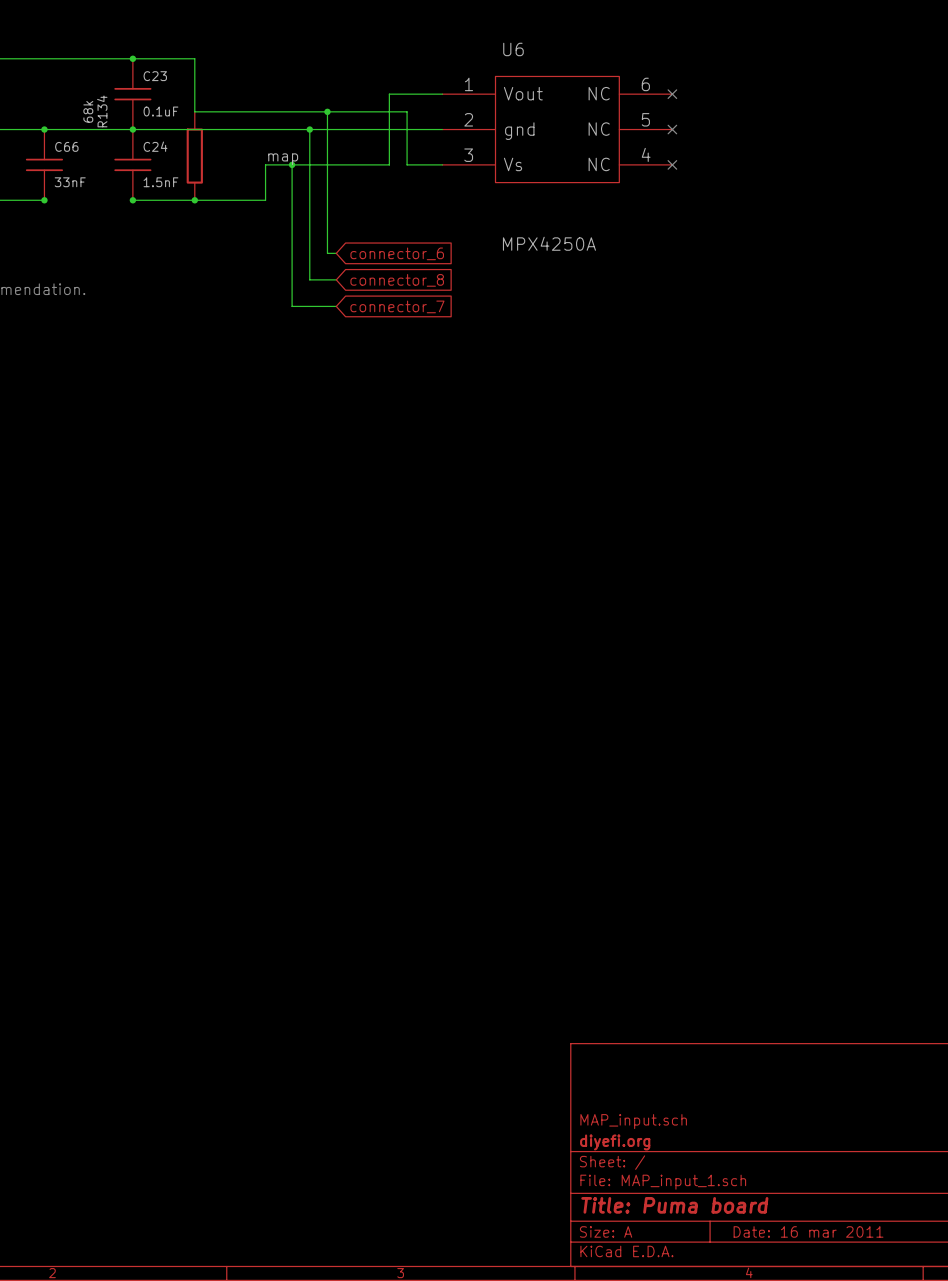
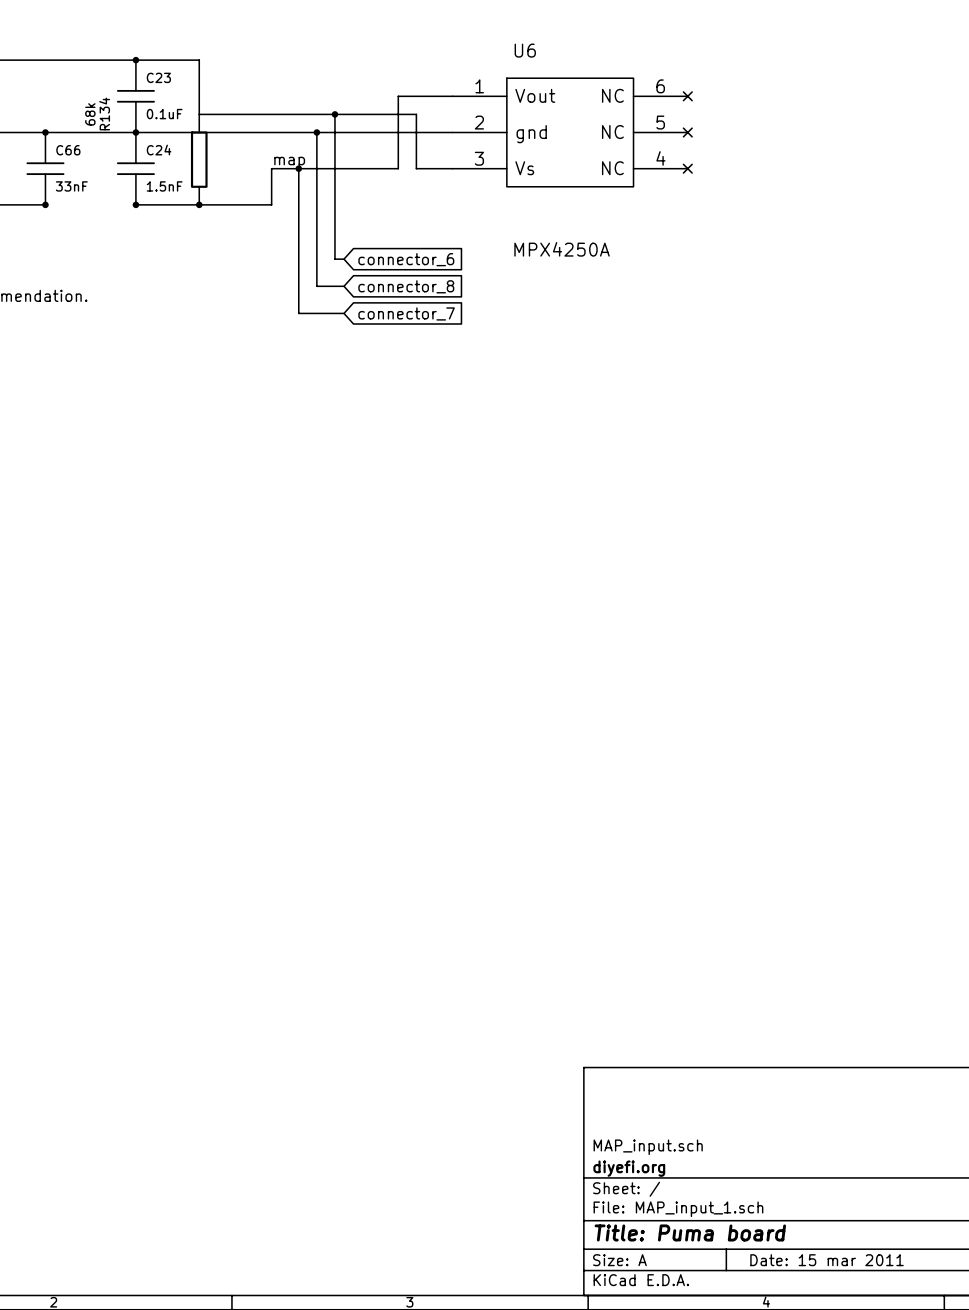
title block: Date: 16 mar 2011 (808, 1231) -> Date: 15 mar 2011 (827, 1260)

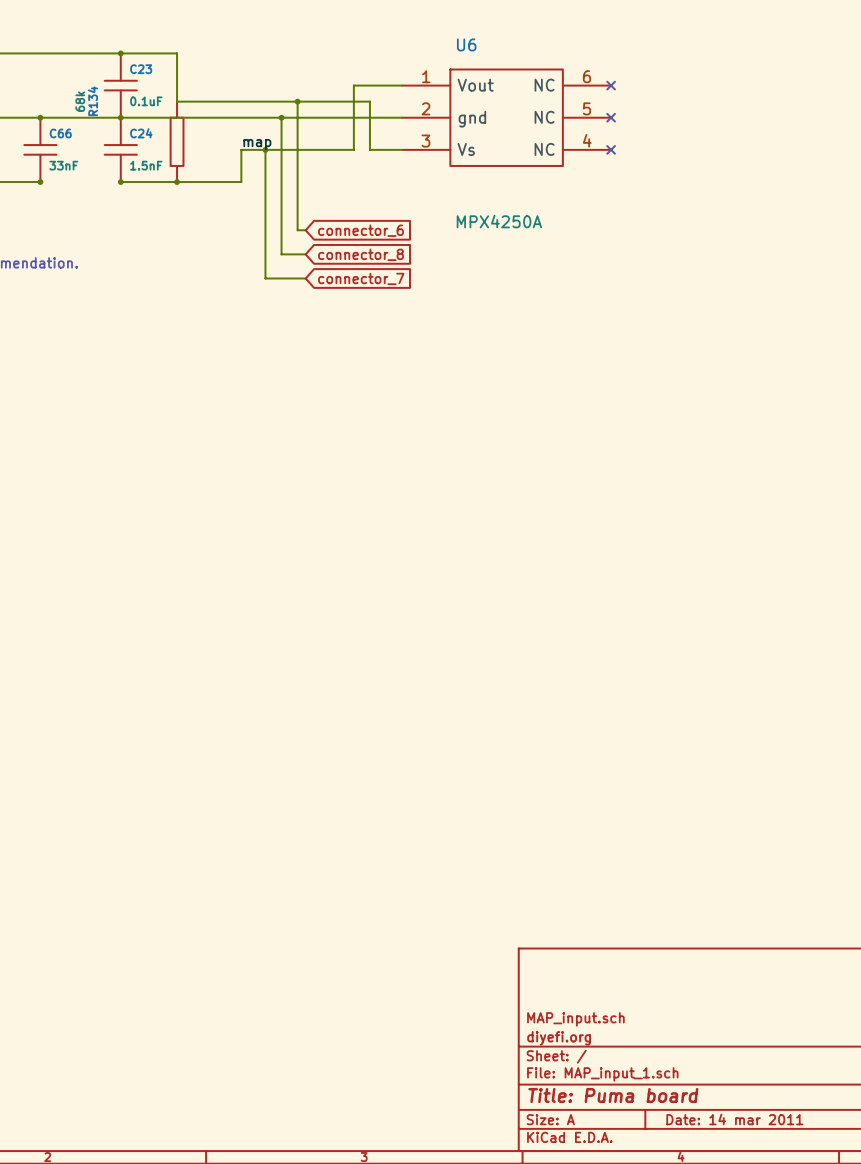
title block: Date: 15 mar 2011 (827, 1260) -> Date: 14 mar 2011 (734, 1119)

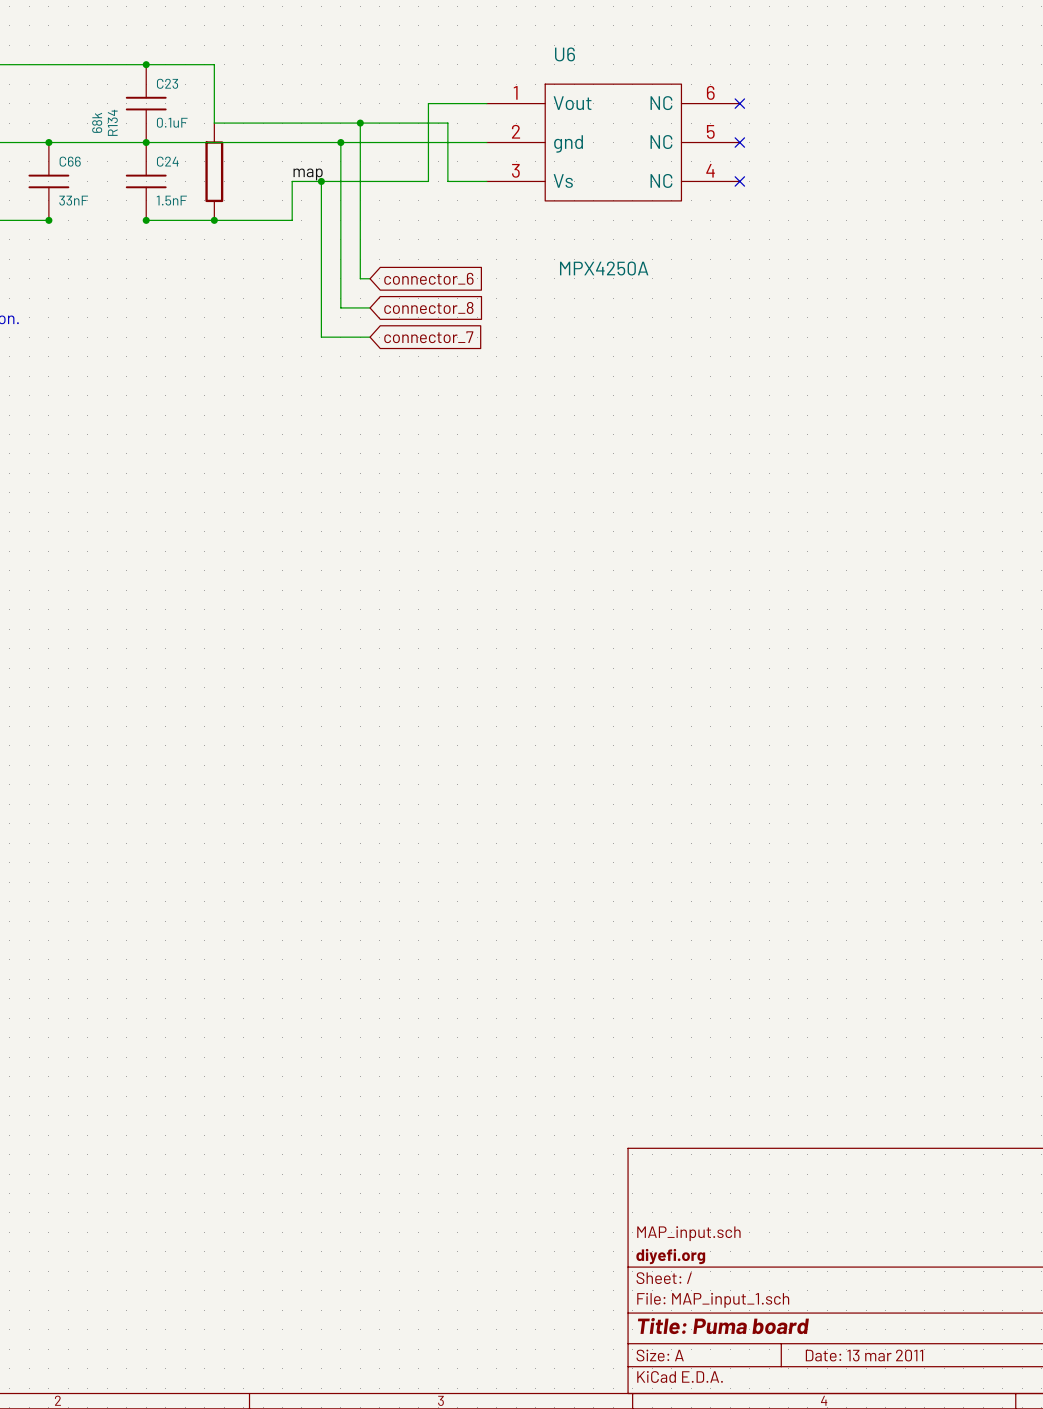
title block: Date: 14 mar 2011 (734, 1119) -> Date: 13 mar 2011 (864, 1355)

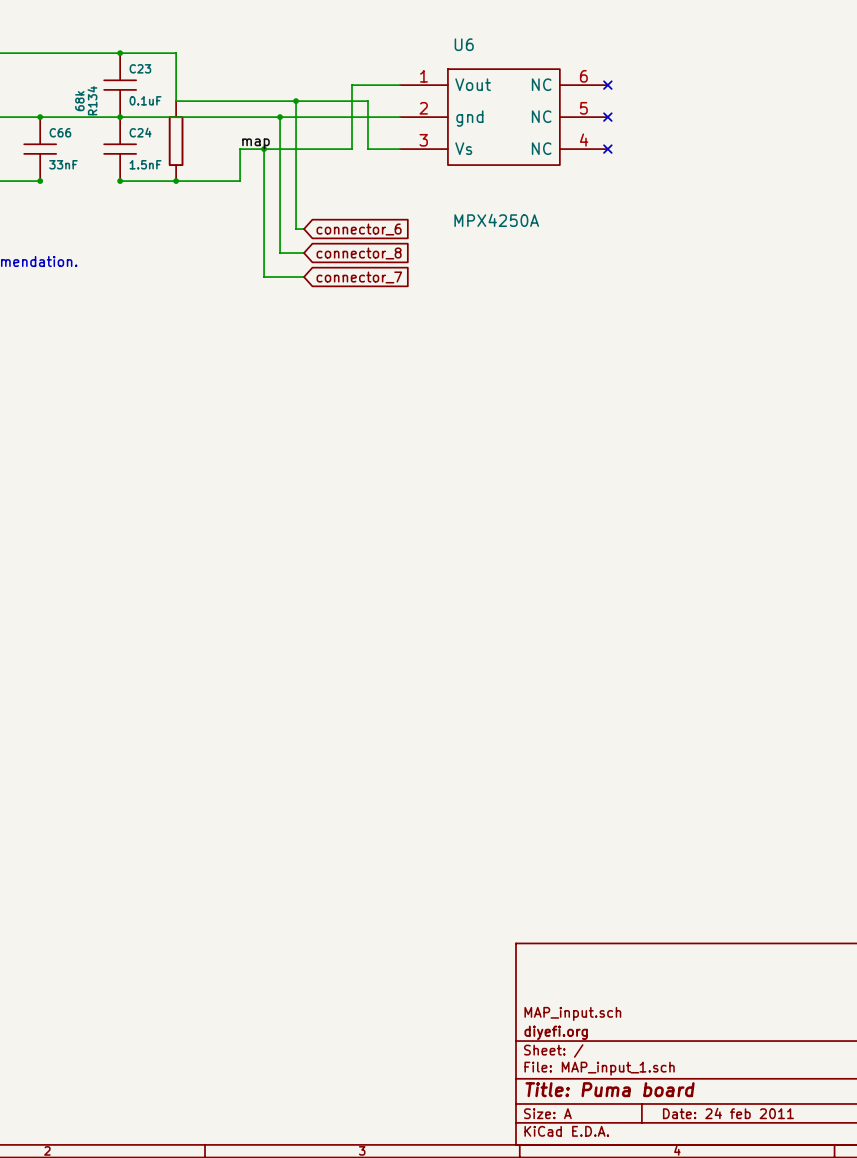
title block: Date: 13 mar 2011 (864, 1355) -> Date: 24 feb 2011 (728, 1113)

